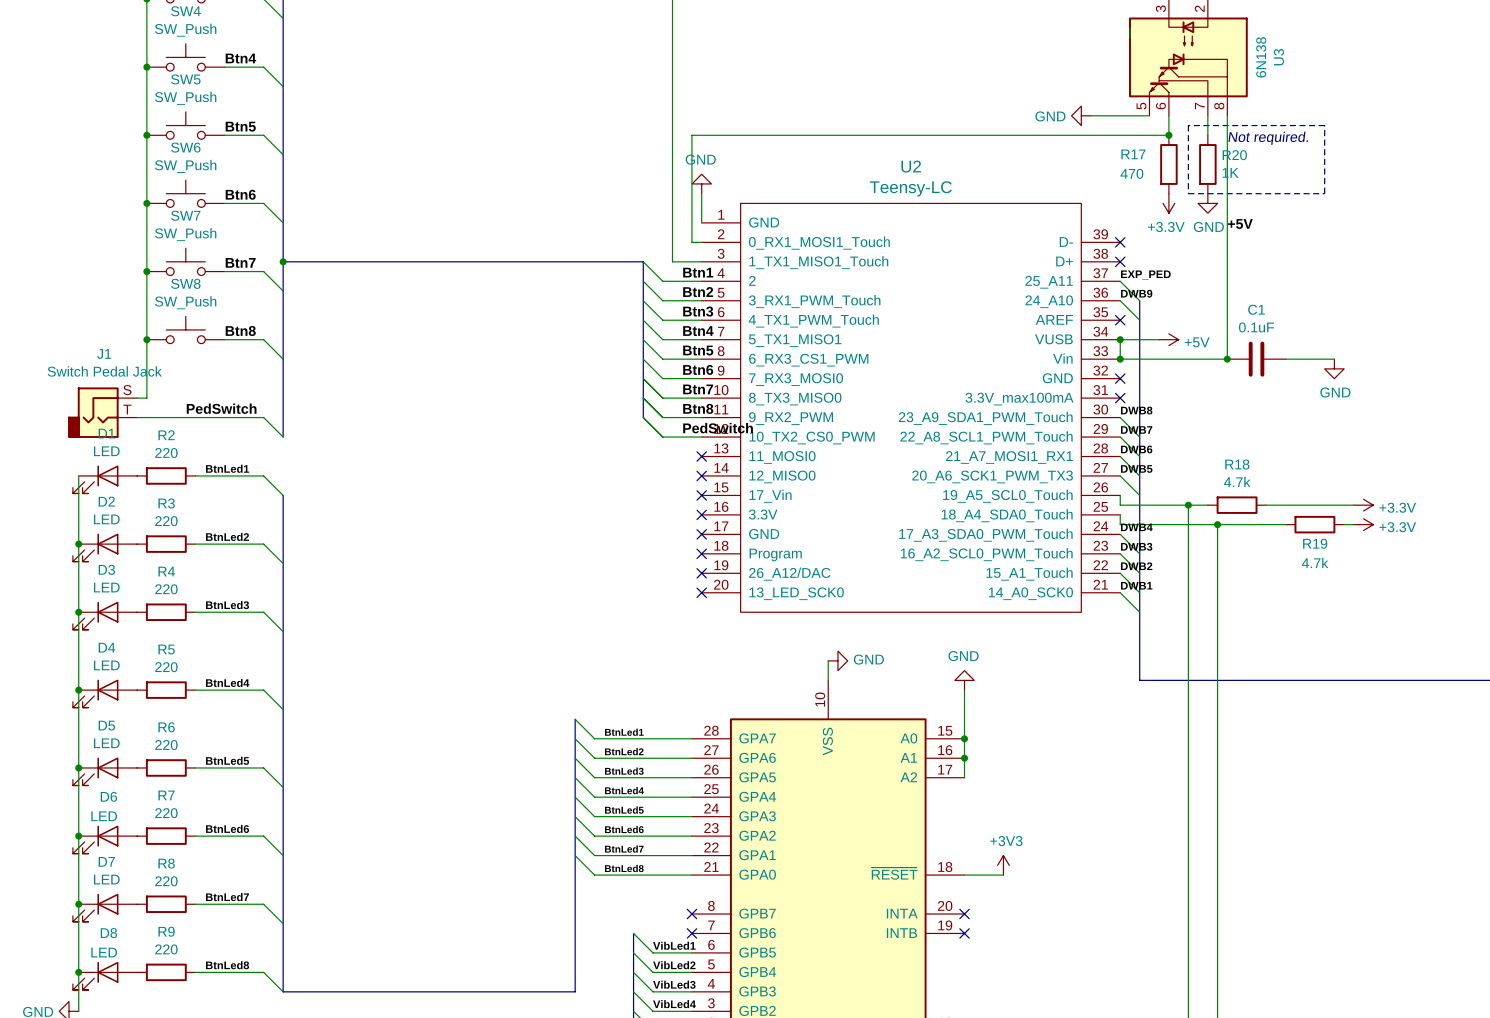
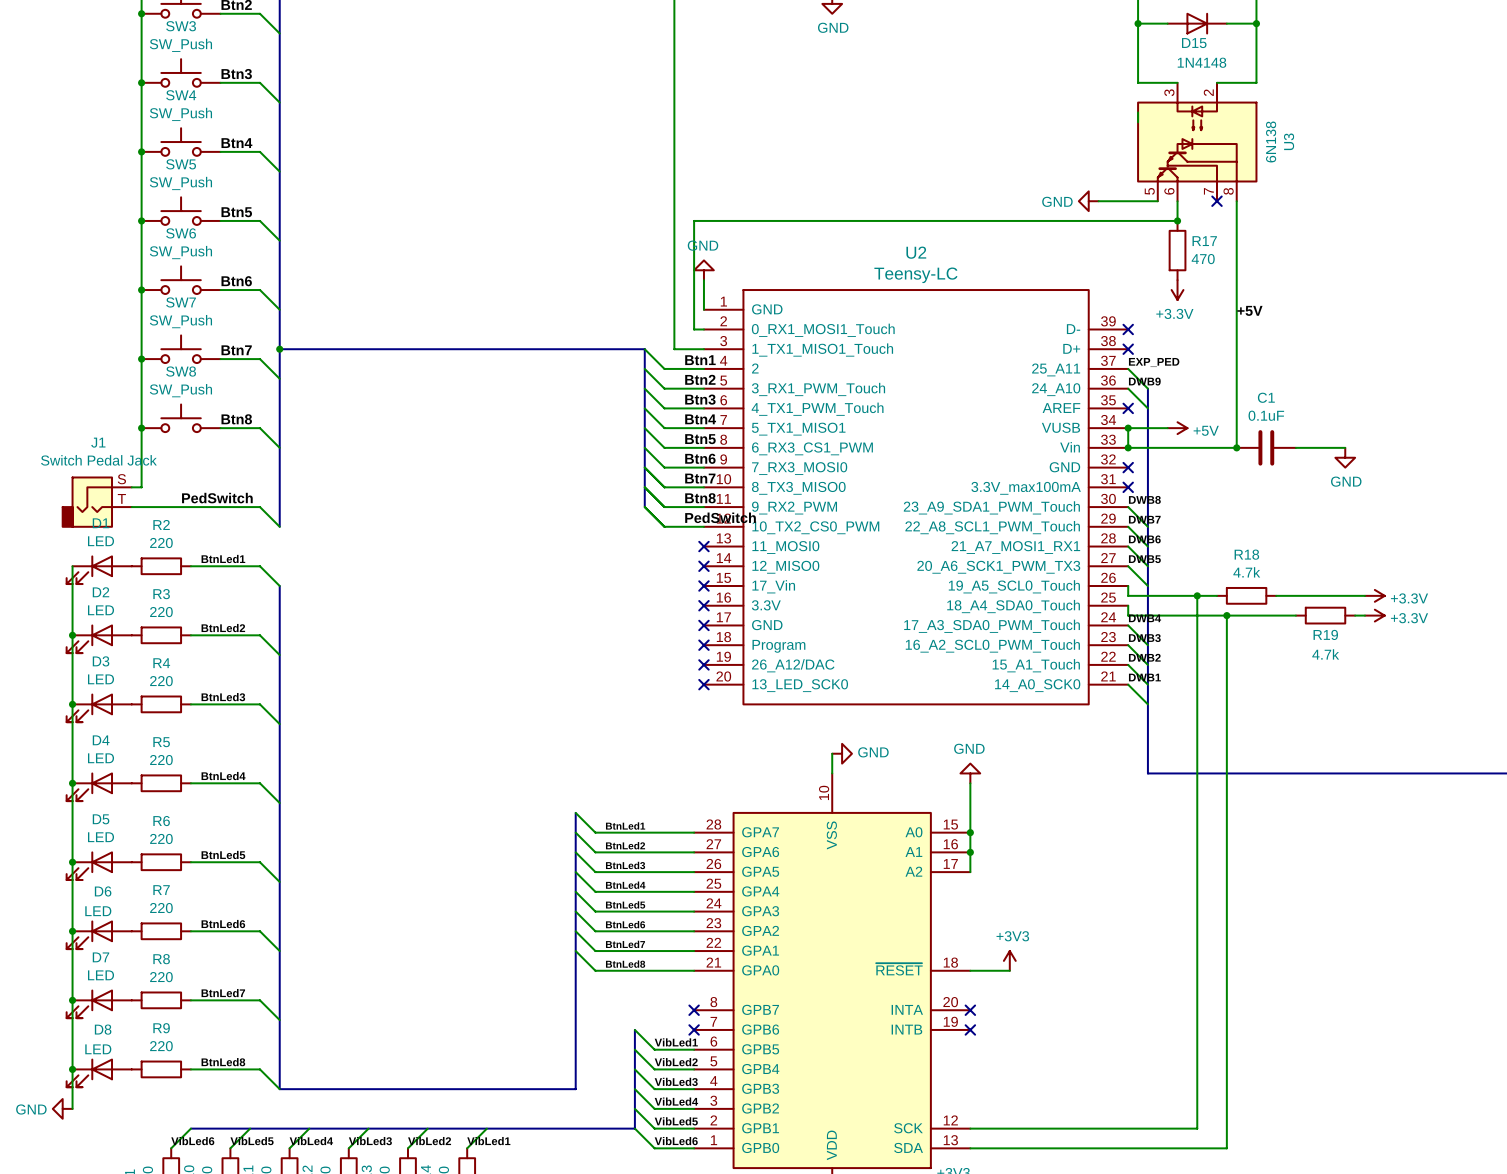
wire: (1207, 115) (1207, 135) -> none
no-connect mark: none -> (1216, 201)
line: (1188, 125) (1188, 193) (1324, 193) (1324, 125) (1188, 125) -> none
text: Not required. (1268, 138) -> none
R17 name position: R17 (1133, 154) -> R17 (1204, 241)
R20: 1K (1207, 164) -> none
R17 value position: 470 (1131, 173) -> 470 (1203, 259)
power symbol: GND (1207, 203) -> none

